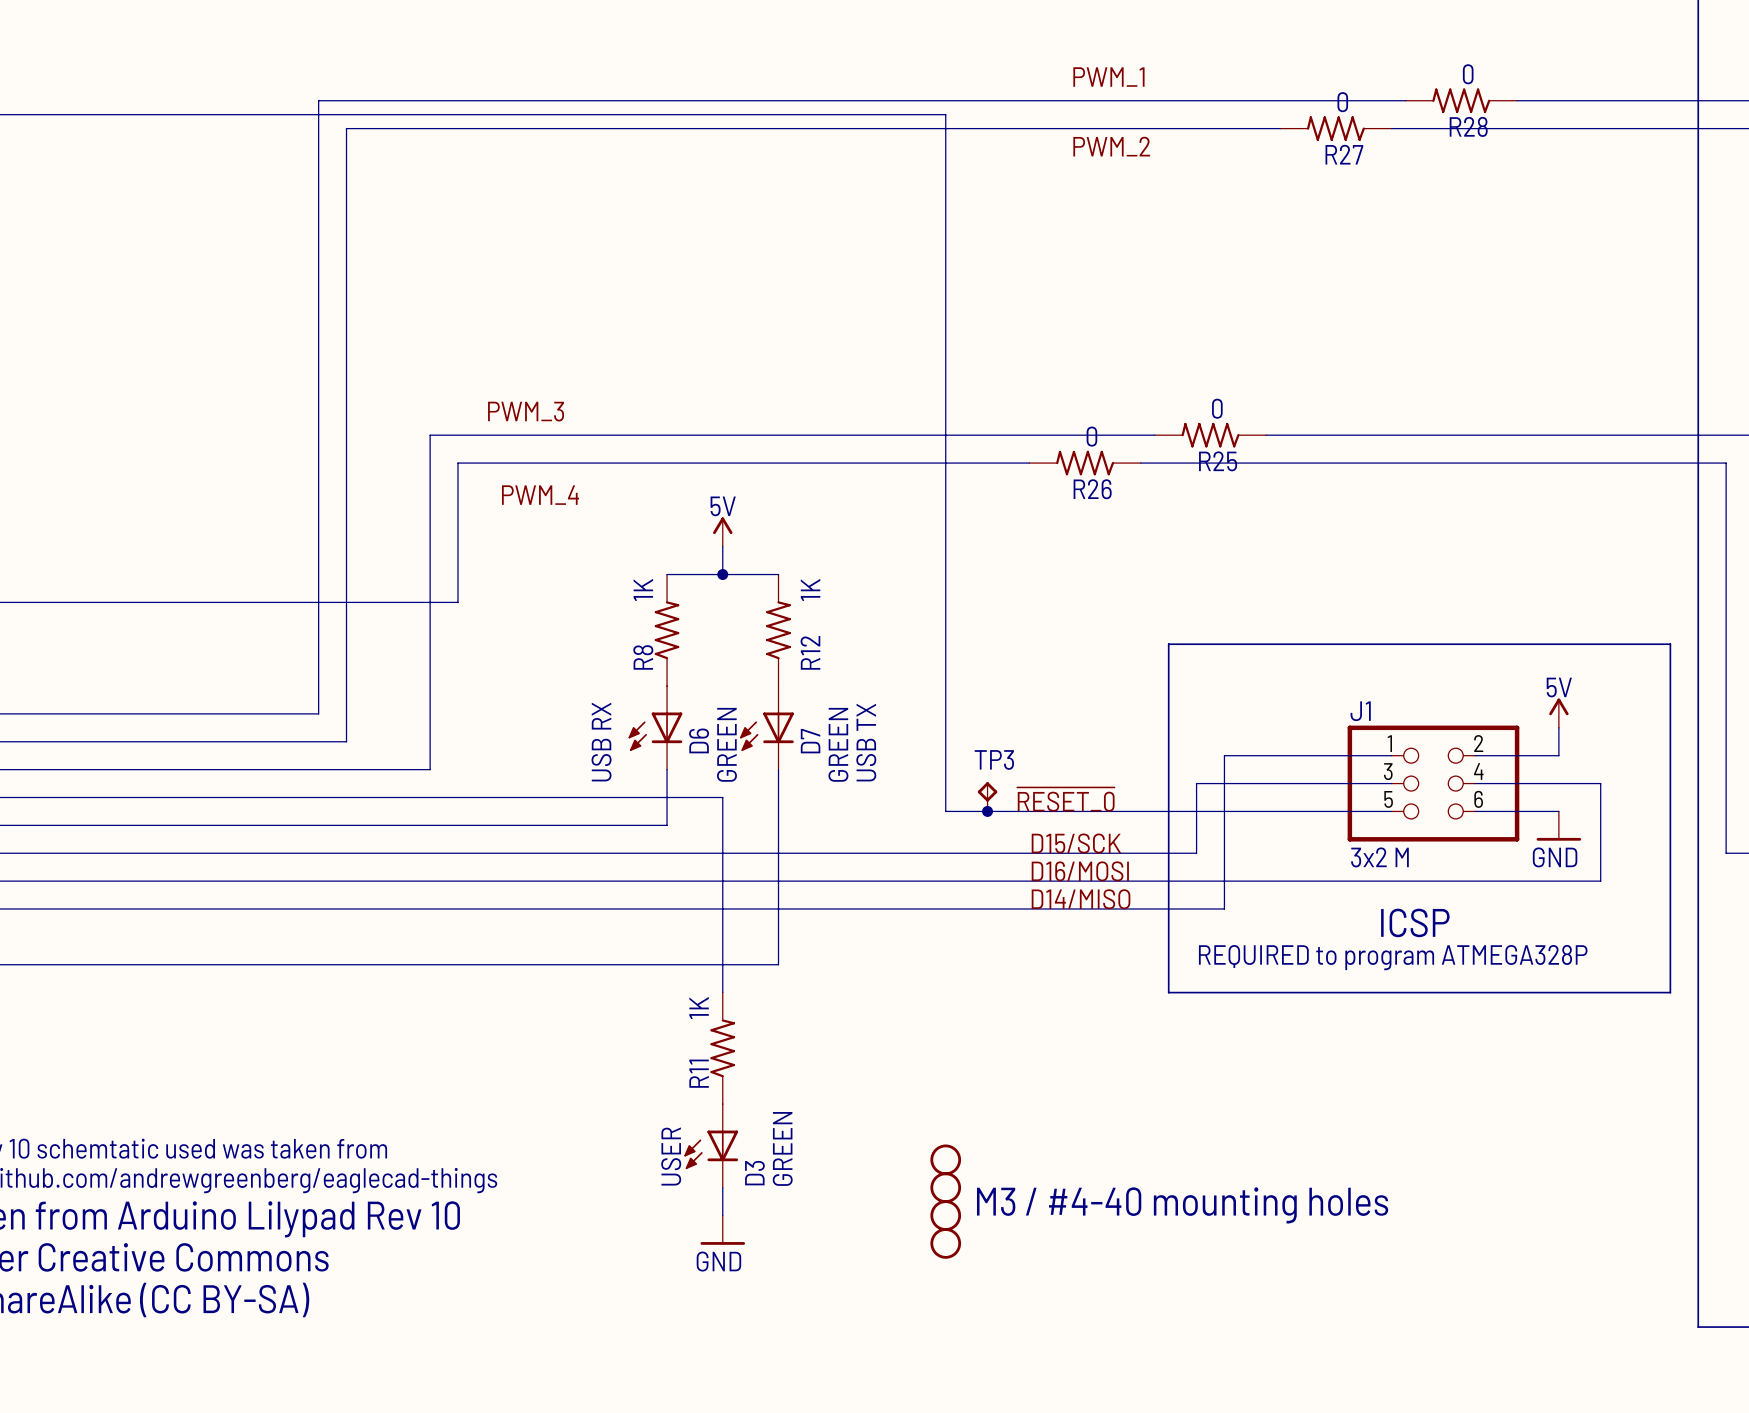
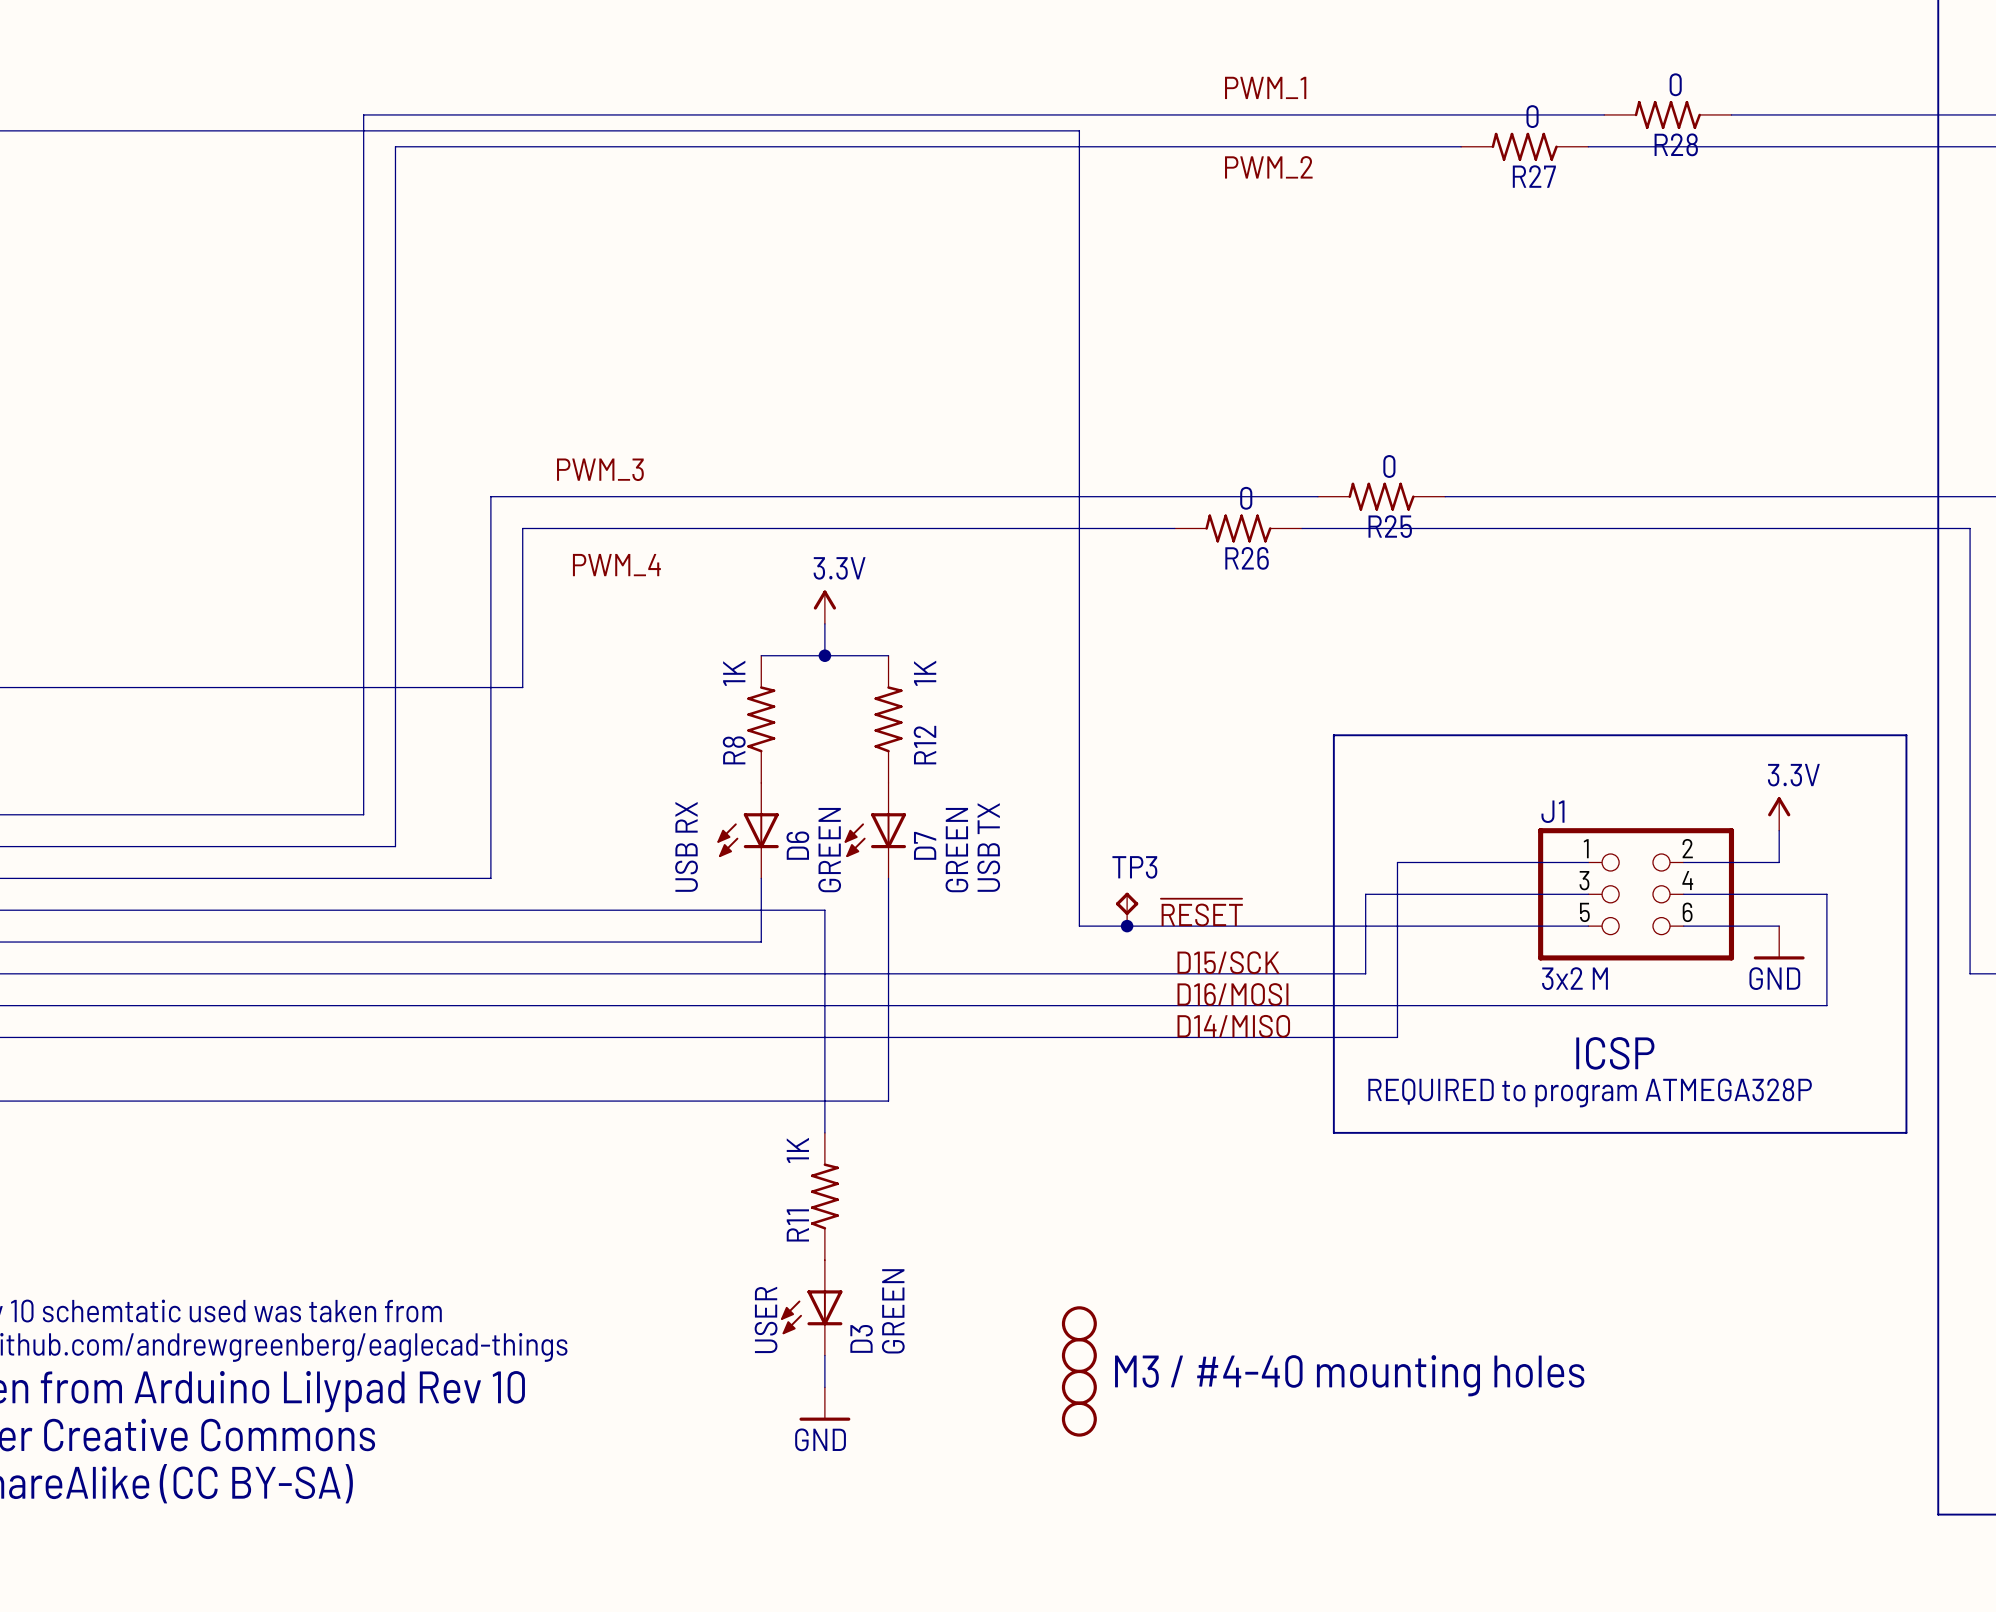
power symbol: 5V (722, 532) -> 3.3V (824, 607)
power symbol: 5V (1558, 713) -> 3.3V (1779, 813)
label: ~{RESET_0} (1065, 799) -> ~{RESET} (1201, 912)

